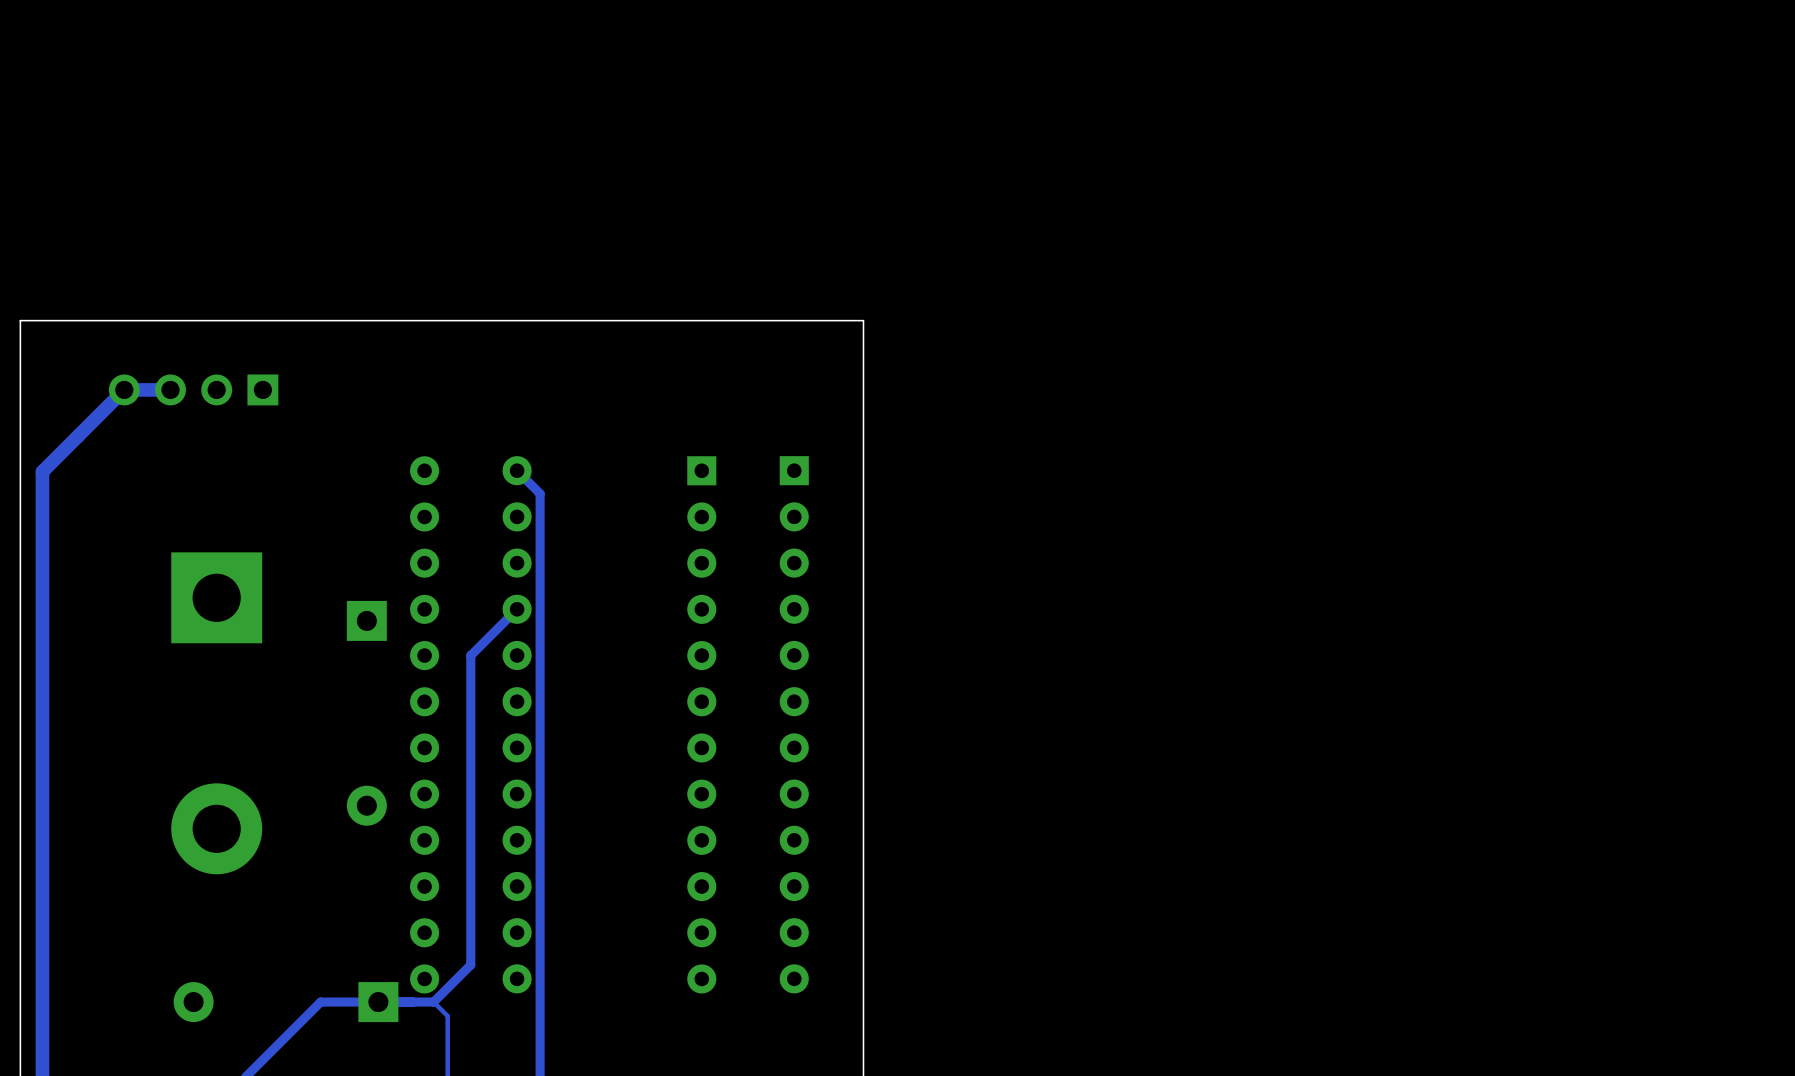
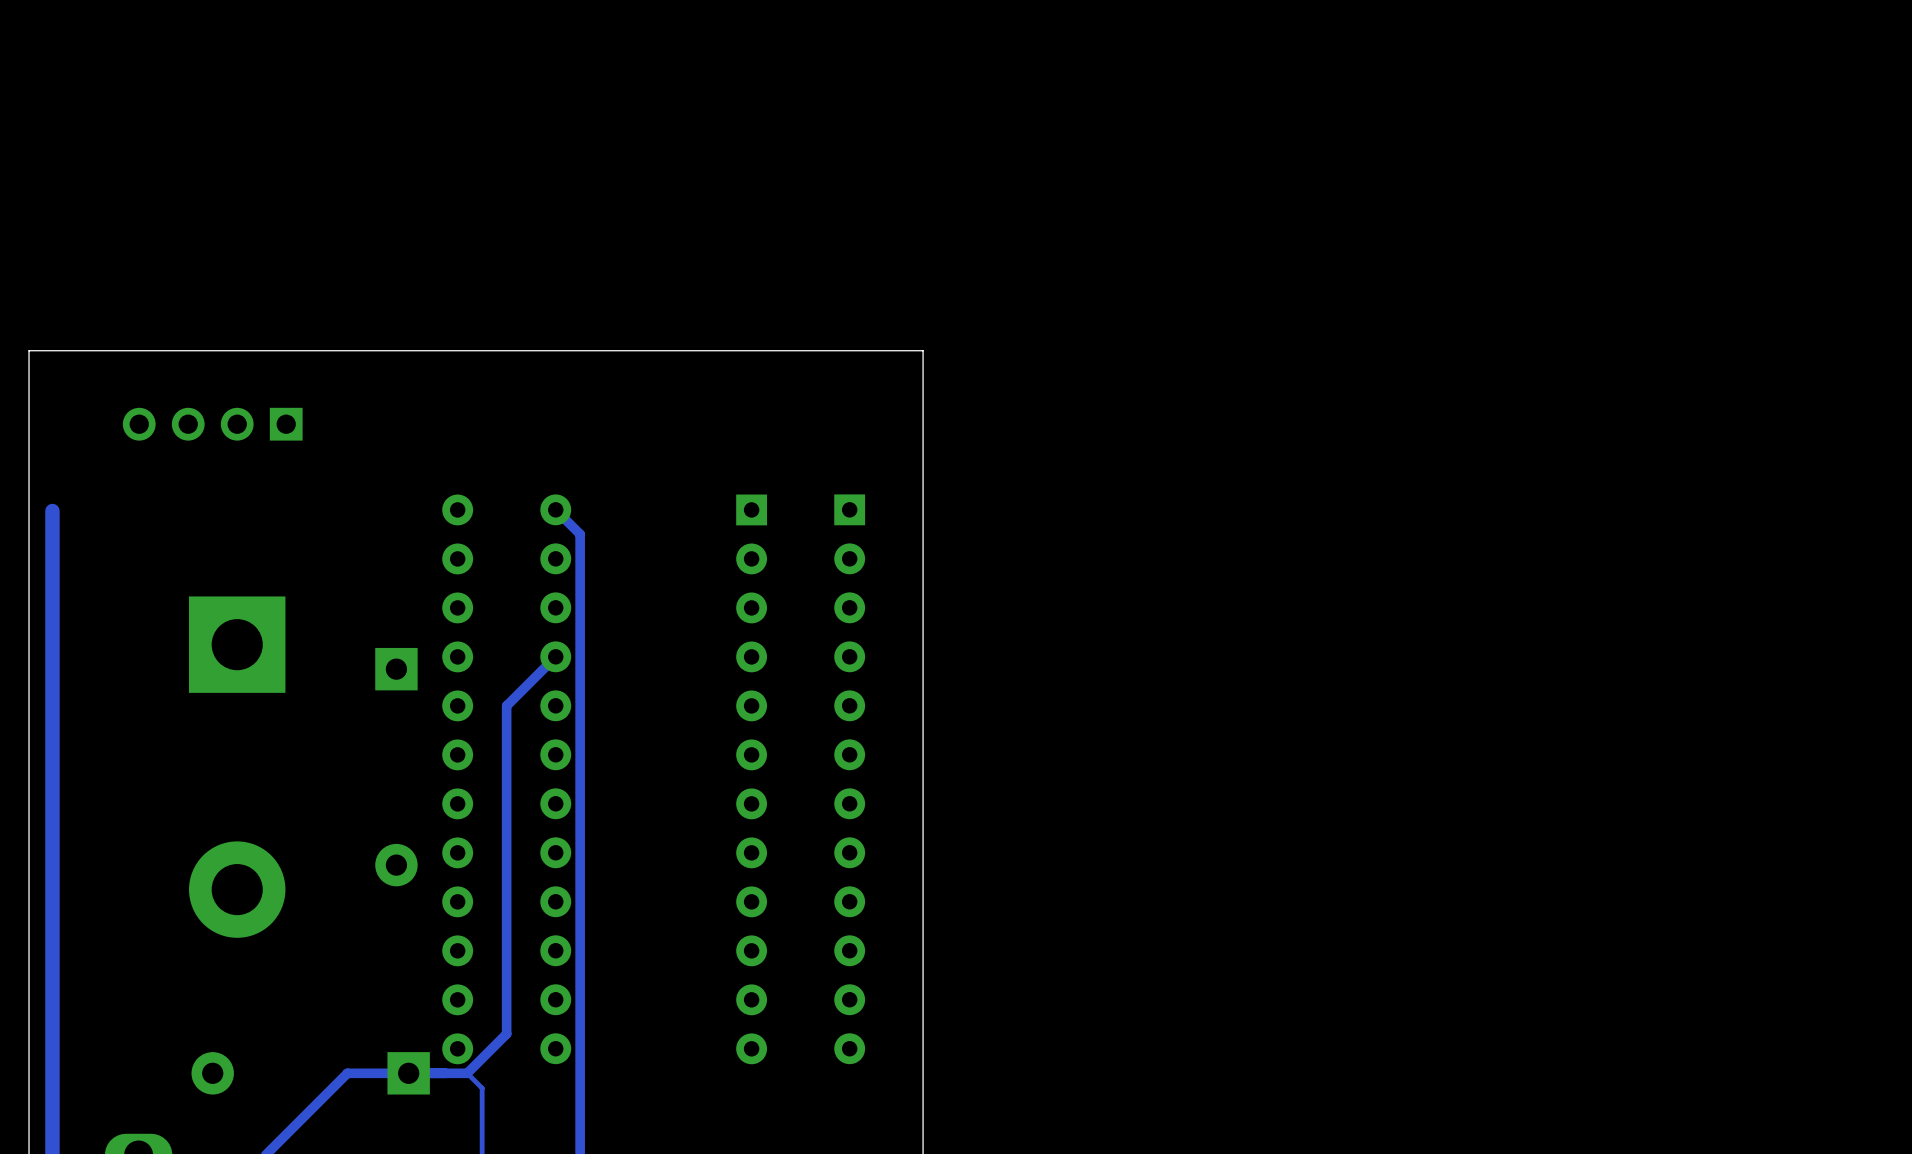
track: (170, 389) (124, 389) (42, 471) -> none

